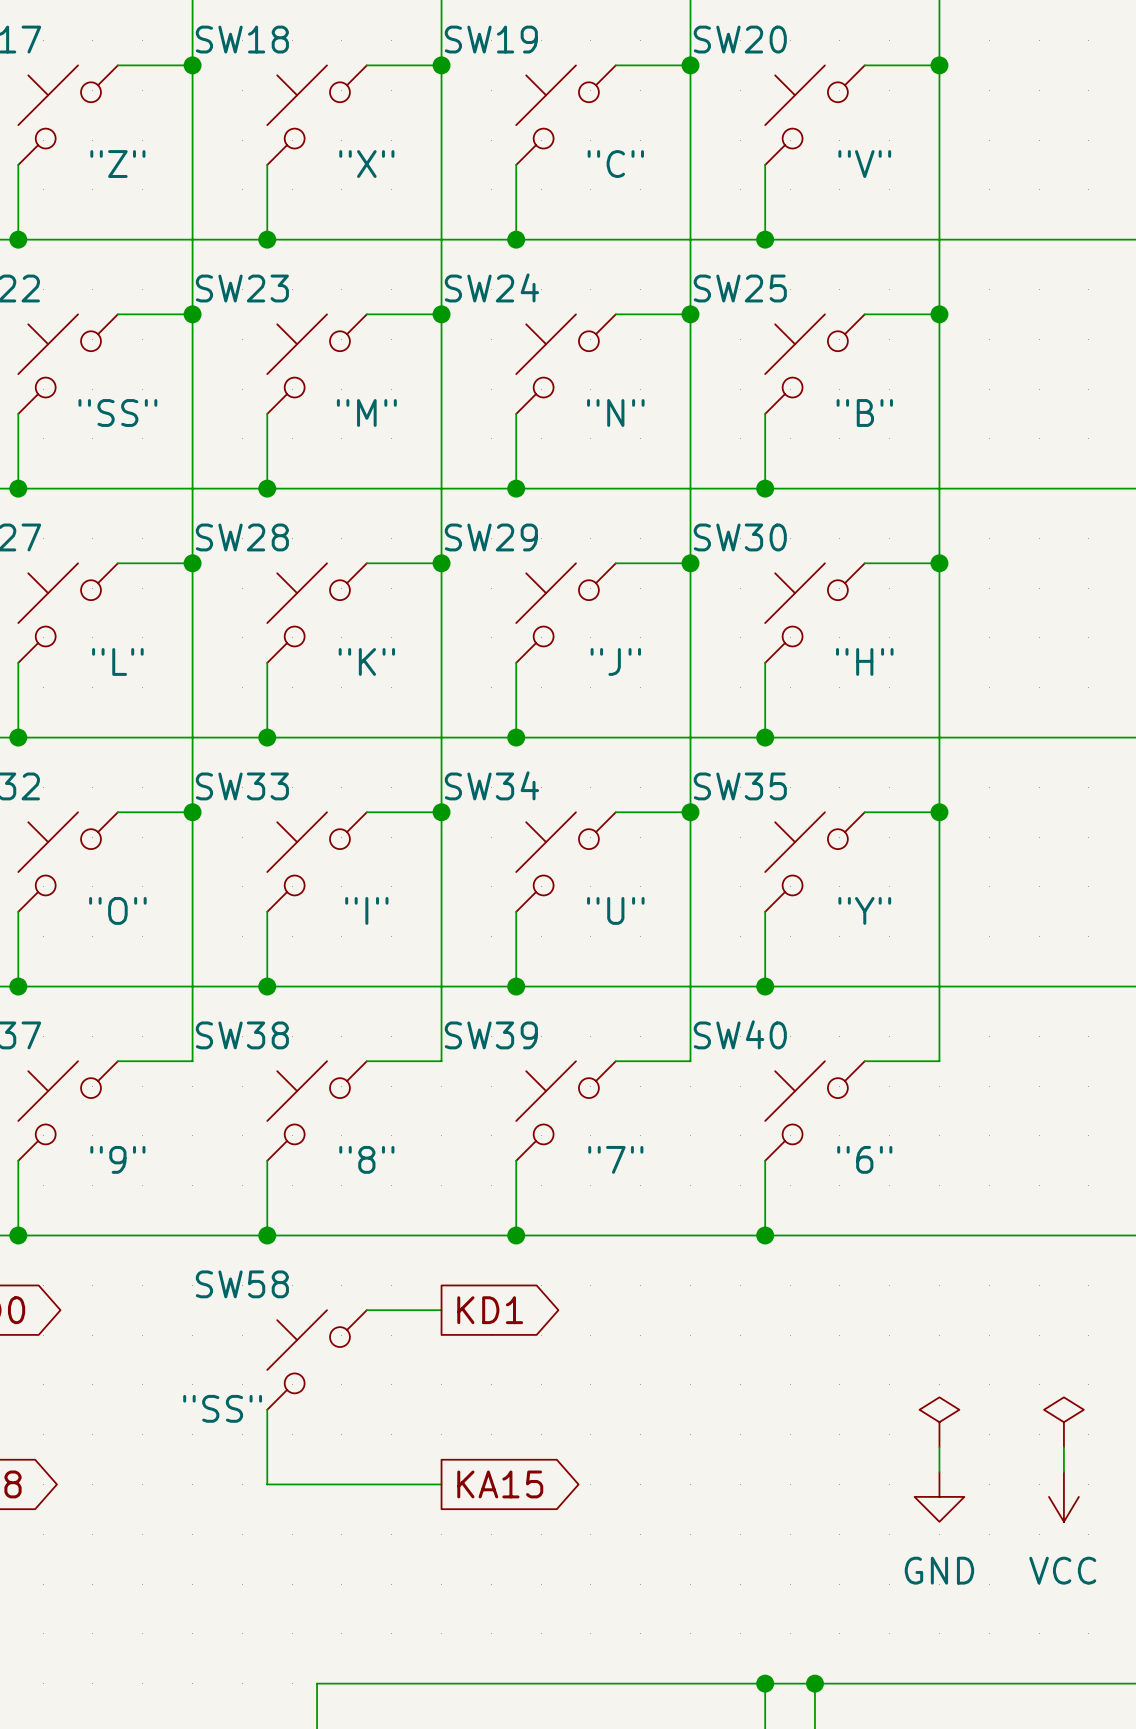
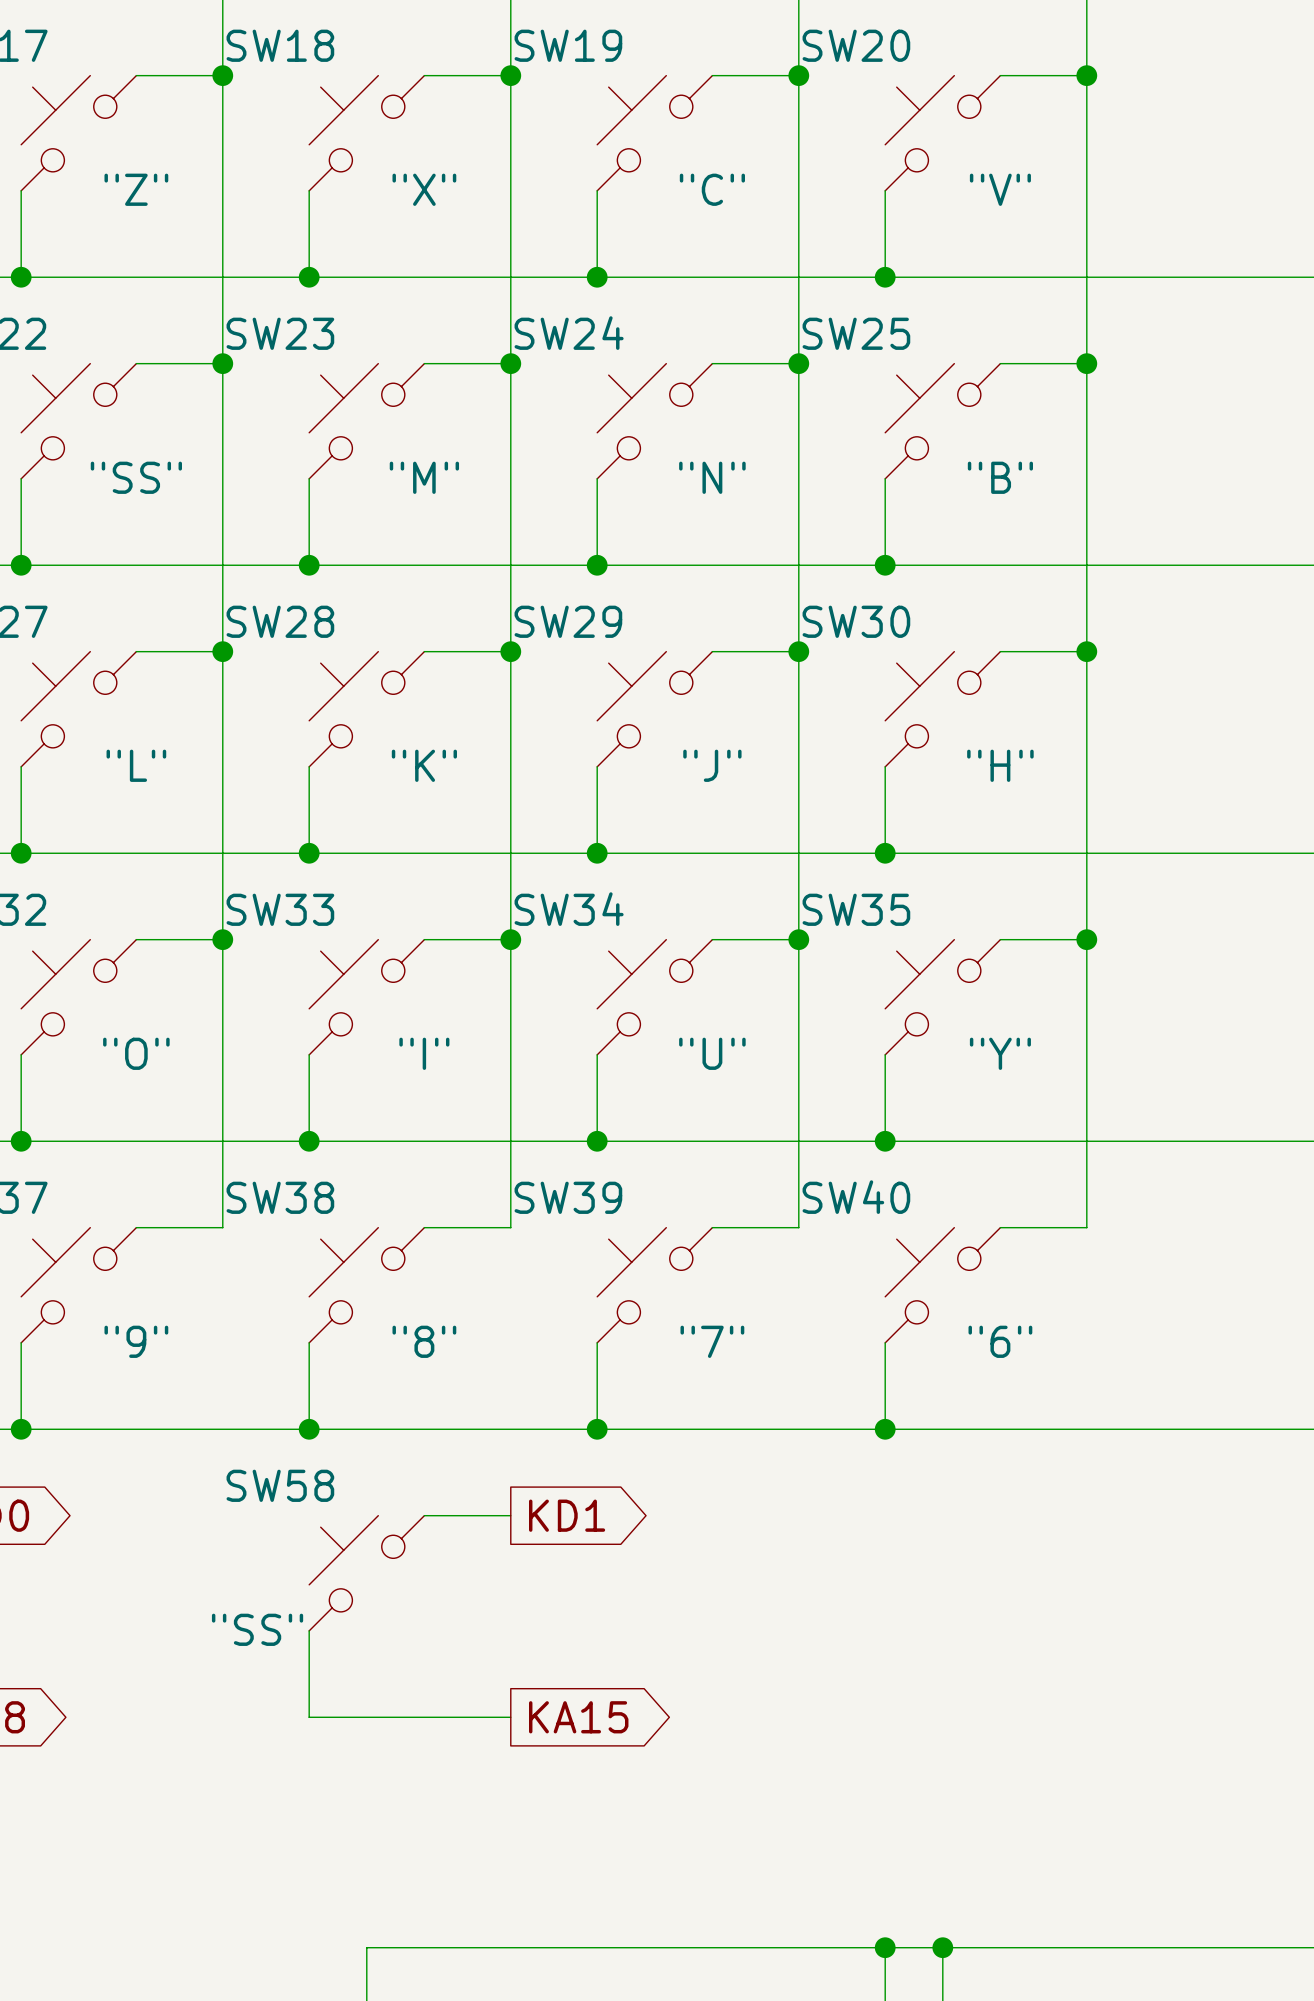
power symbol: (939, 1422) -> none
power symbol: (1063, 1422) -> none
wire: (939, 1447) (939, 1472) -> none
wire: (1063, 1447) (1063, 1472) -> none
power symbol: GND (939, 1496) -> none
power symbol: VCC (1063, 1496) -> none

